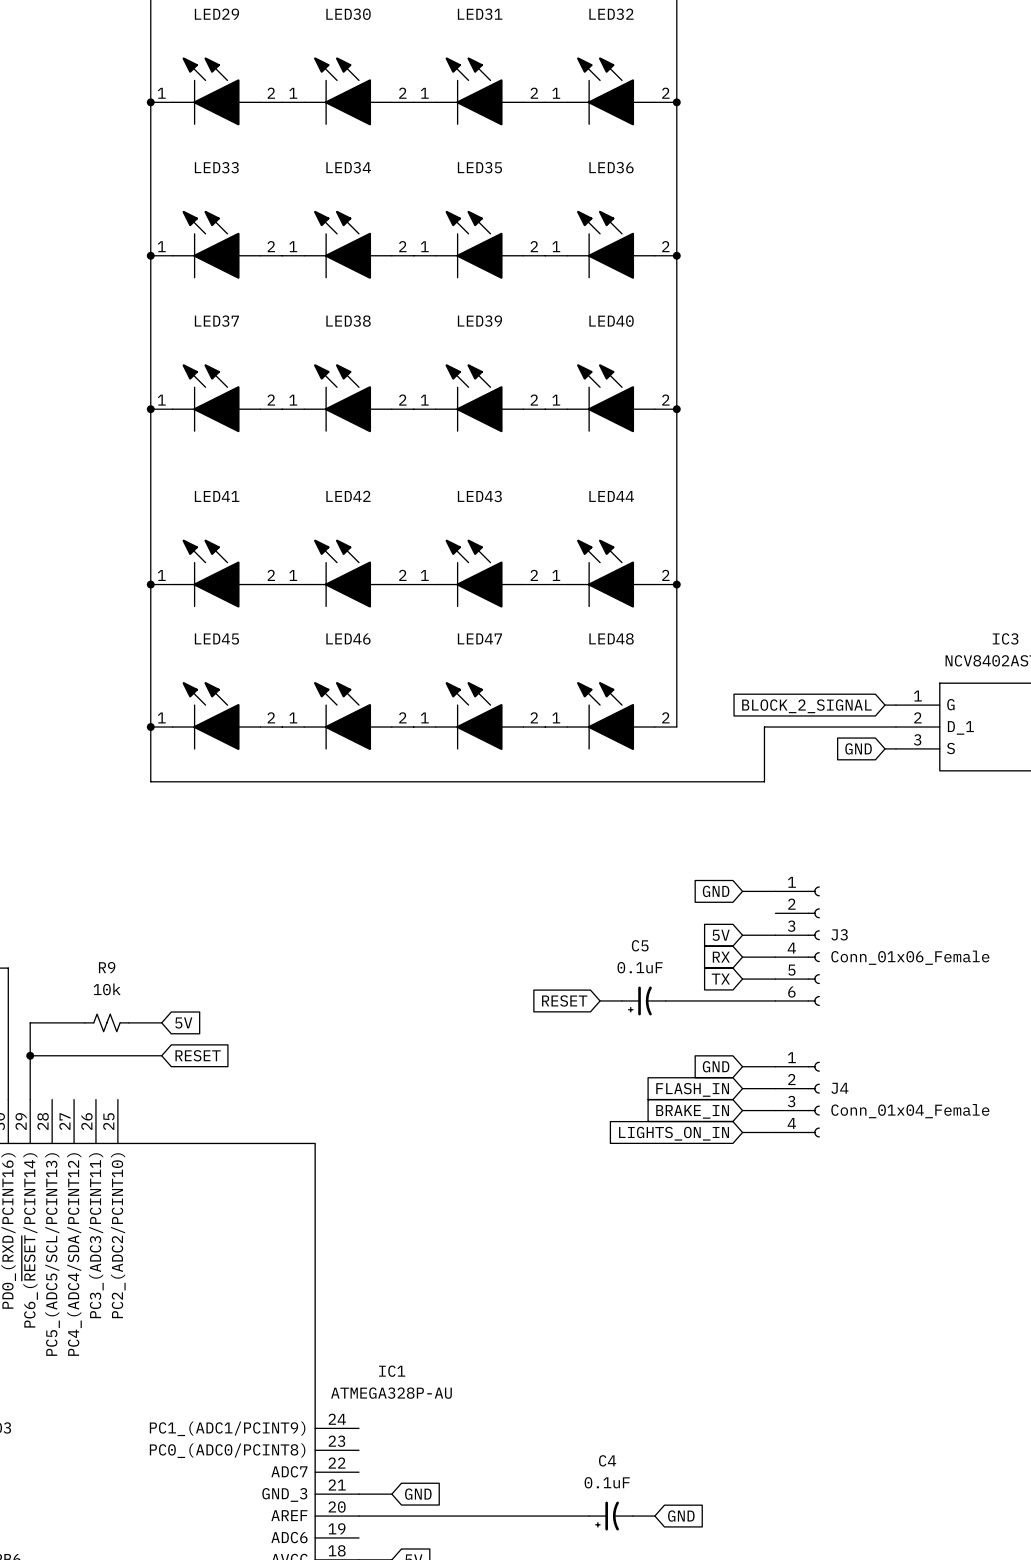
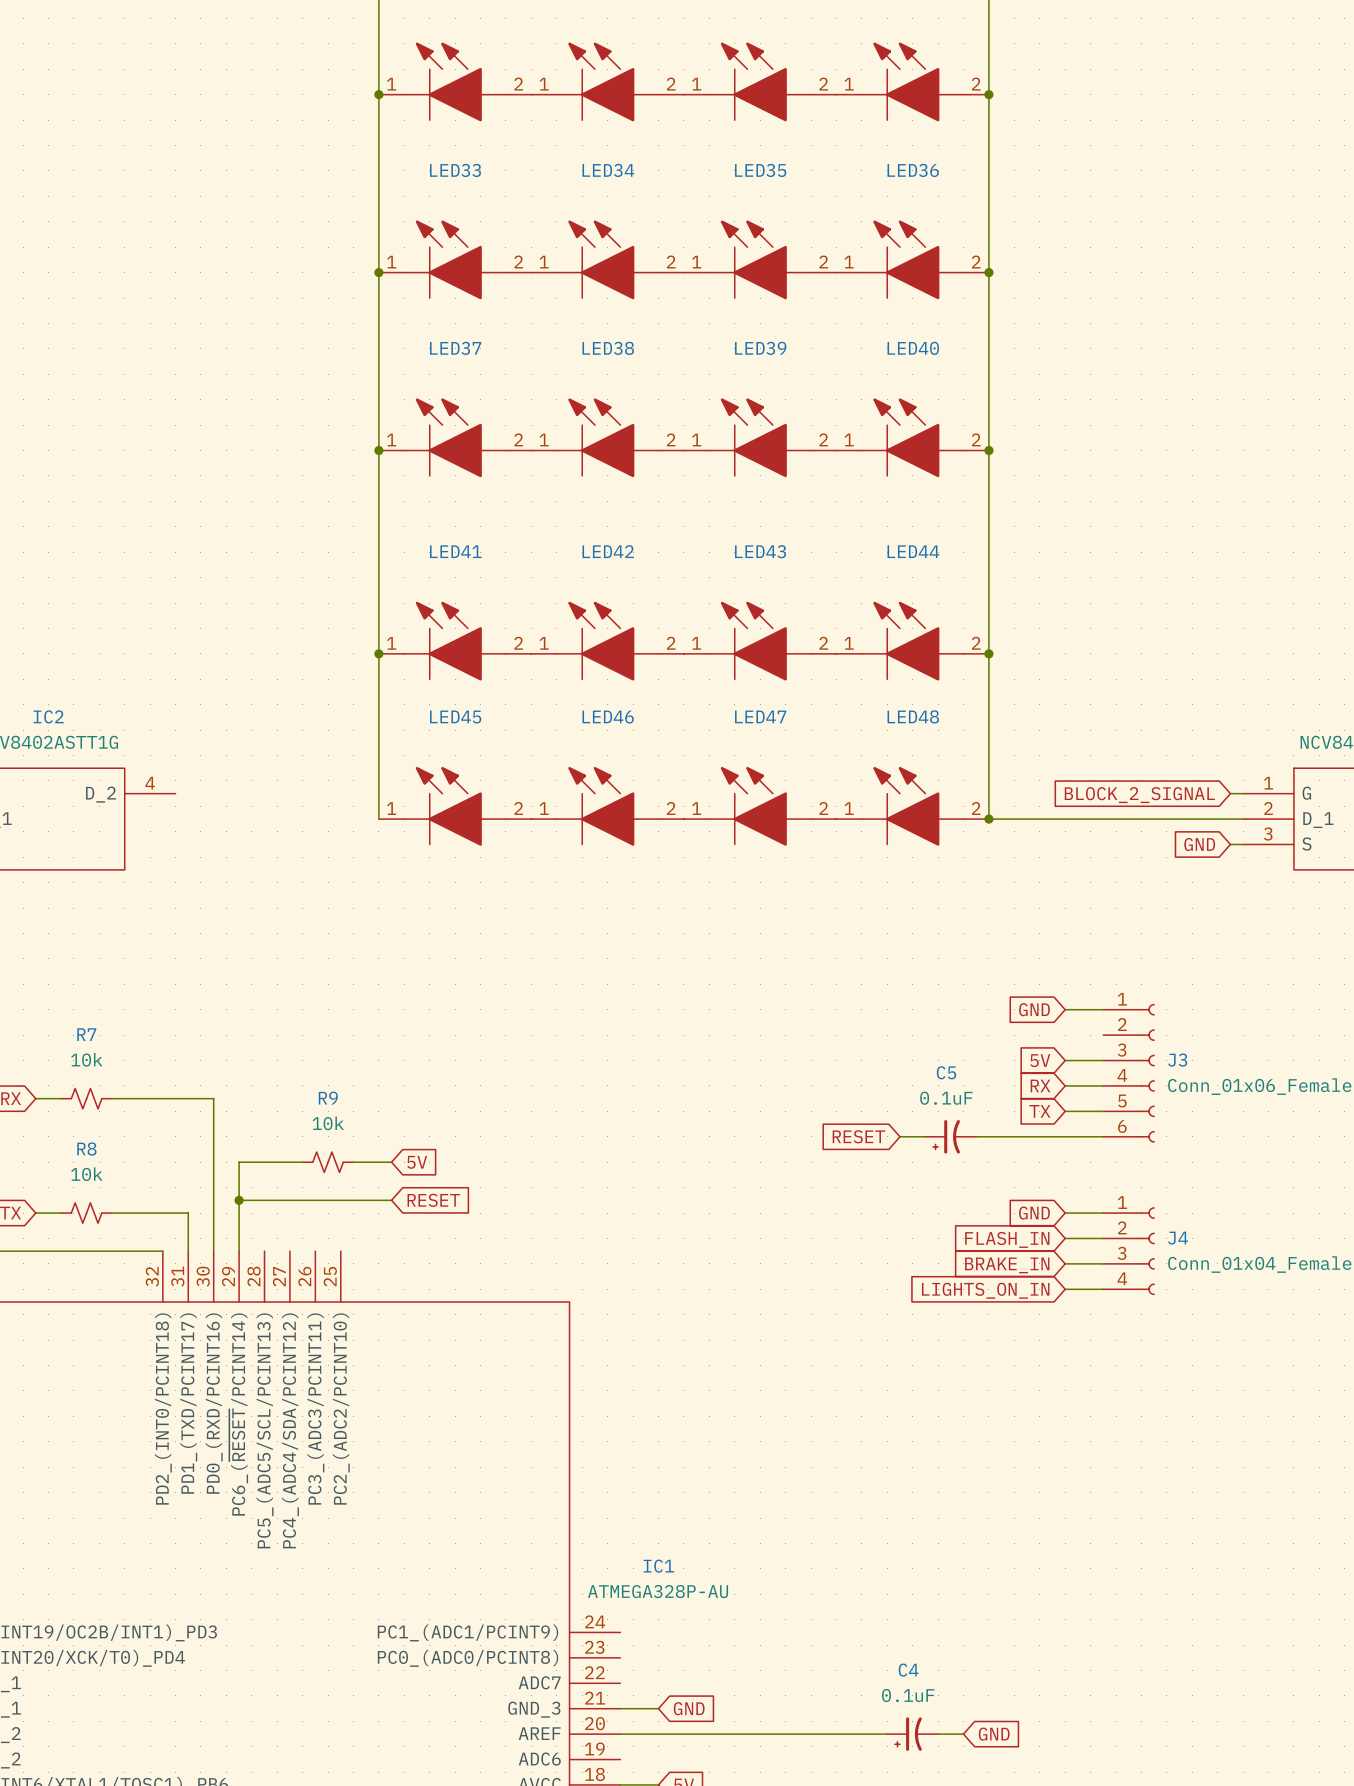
wire: (150, 727) (150, 781) (764, 781) (764, 727) -> (988, 819) (1090, 819)
junction: (150, 727) -> none
junction: none -> (988, 819)

